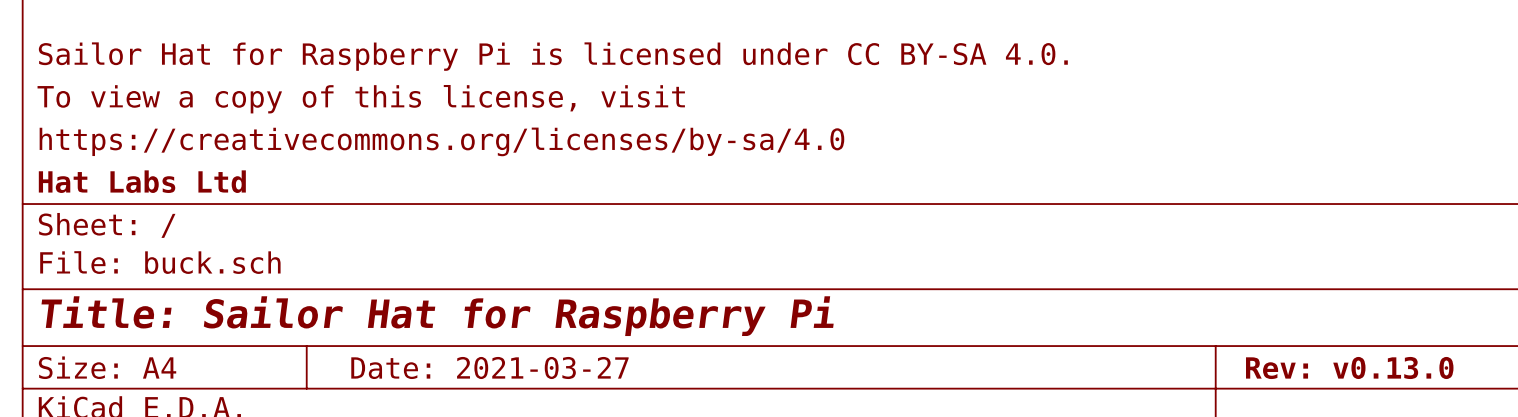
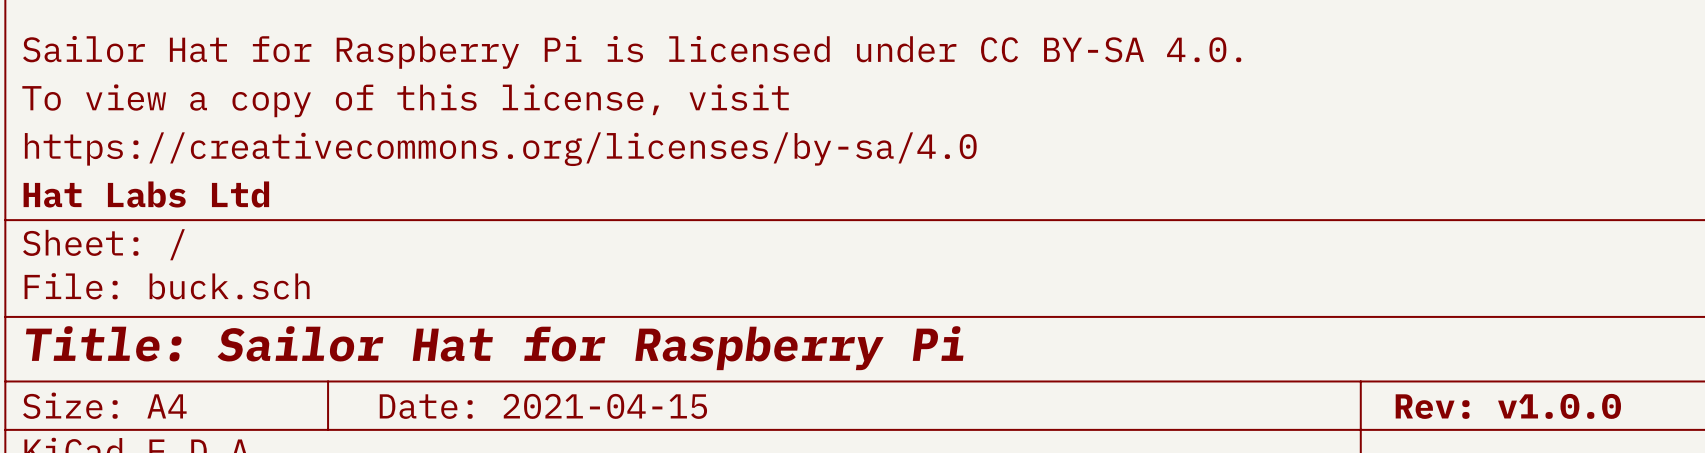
title block: Date: 2021-03-27 (489, 367) -> Date: 2021-04-15 (543, 406)
title block: Rev: v0.13.0 (1349, 367) -> Rev: v1.0.0 (1508, 406)

